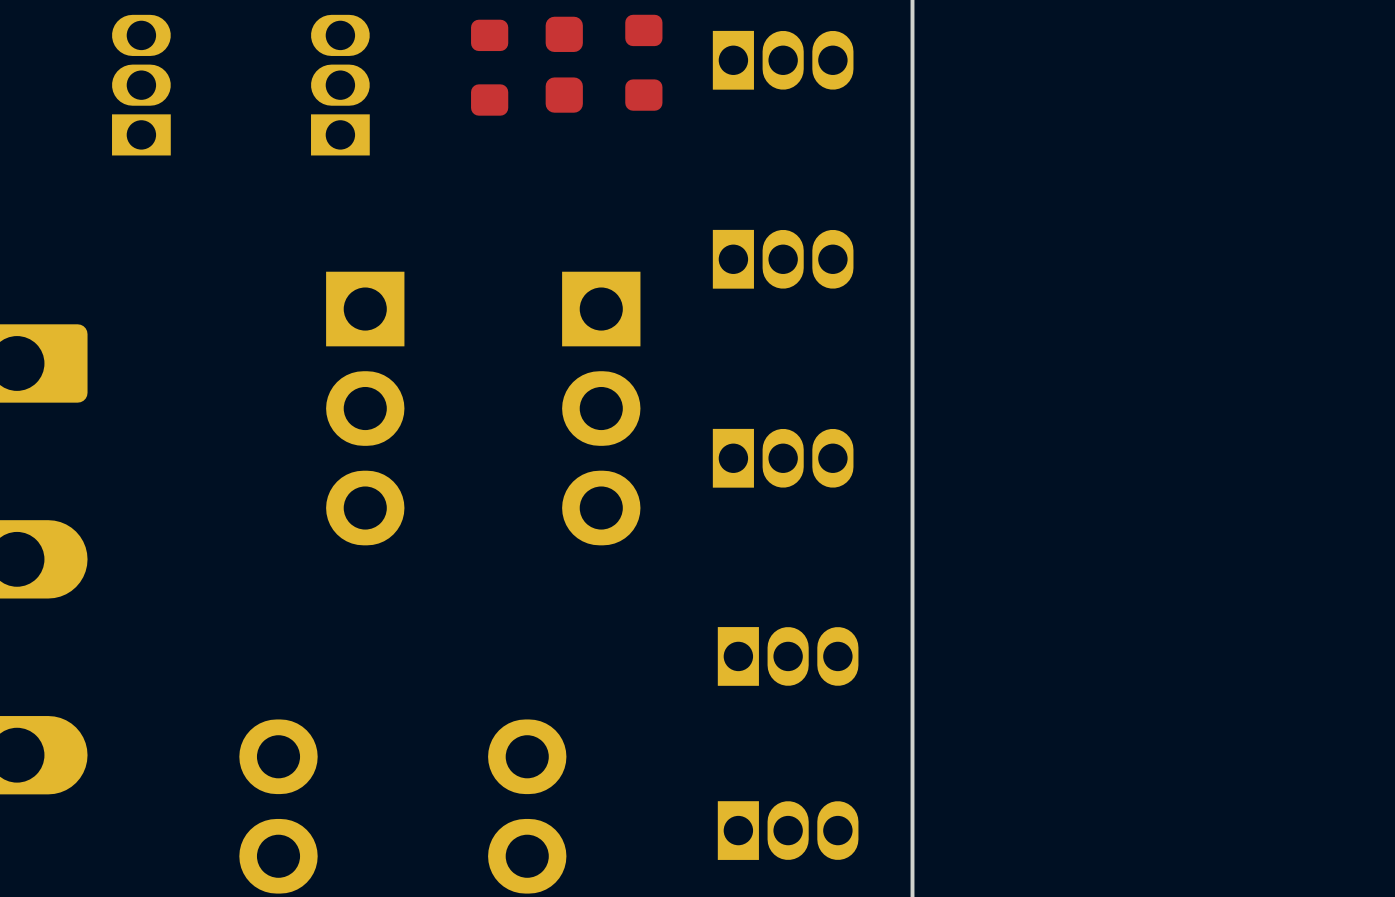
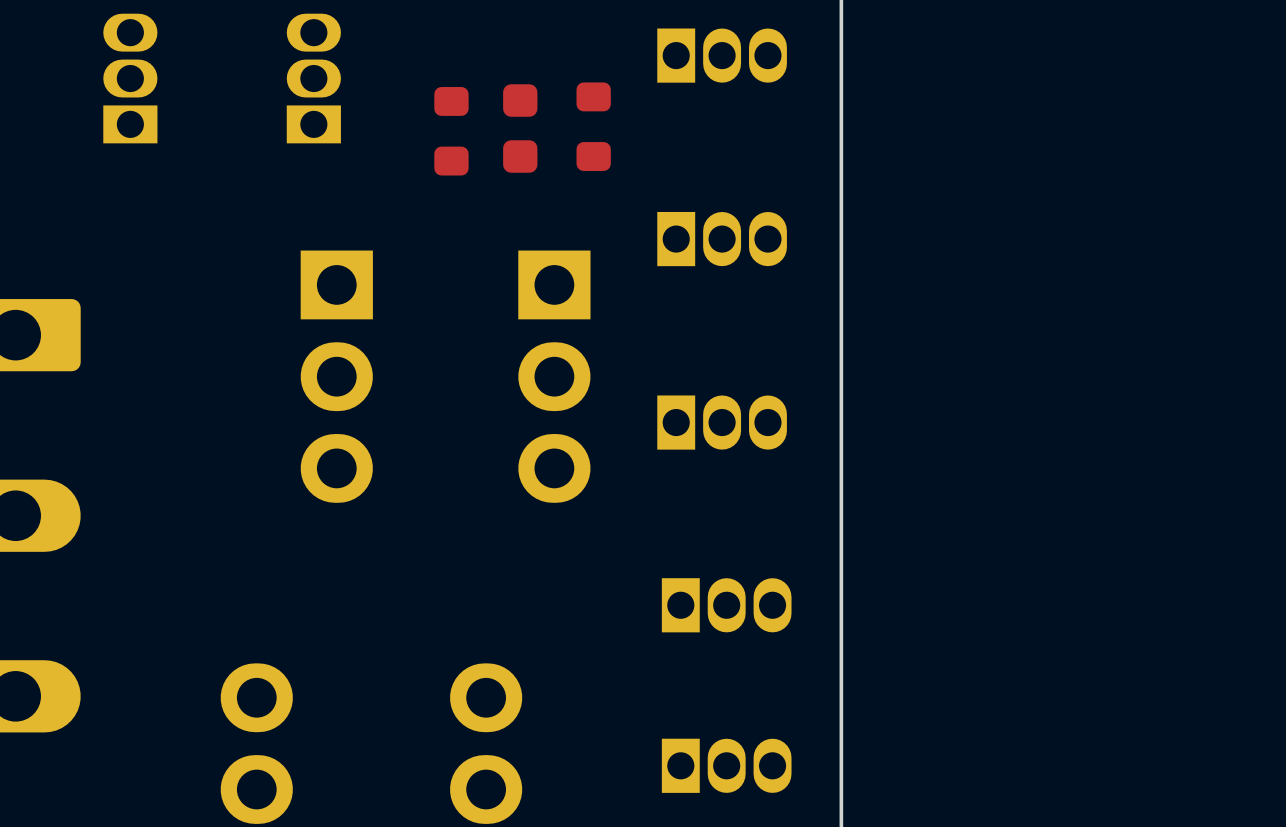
part position: (643, 62) -> (593, 126)
part position: (564, 64) -> (520, 128)
part position: (489, 67) -> (451, 131)

